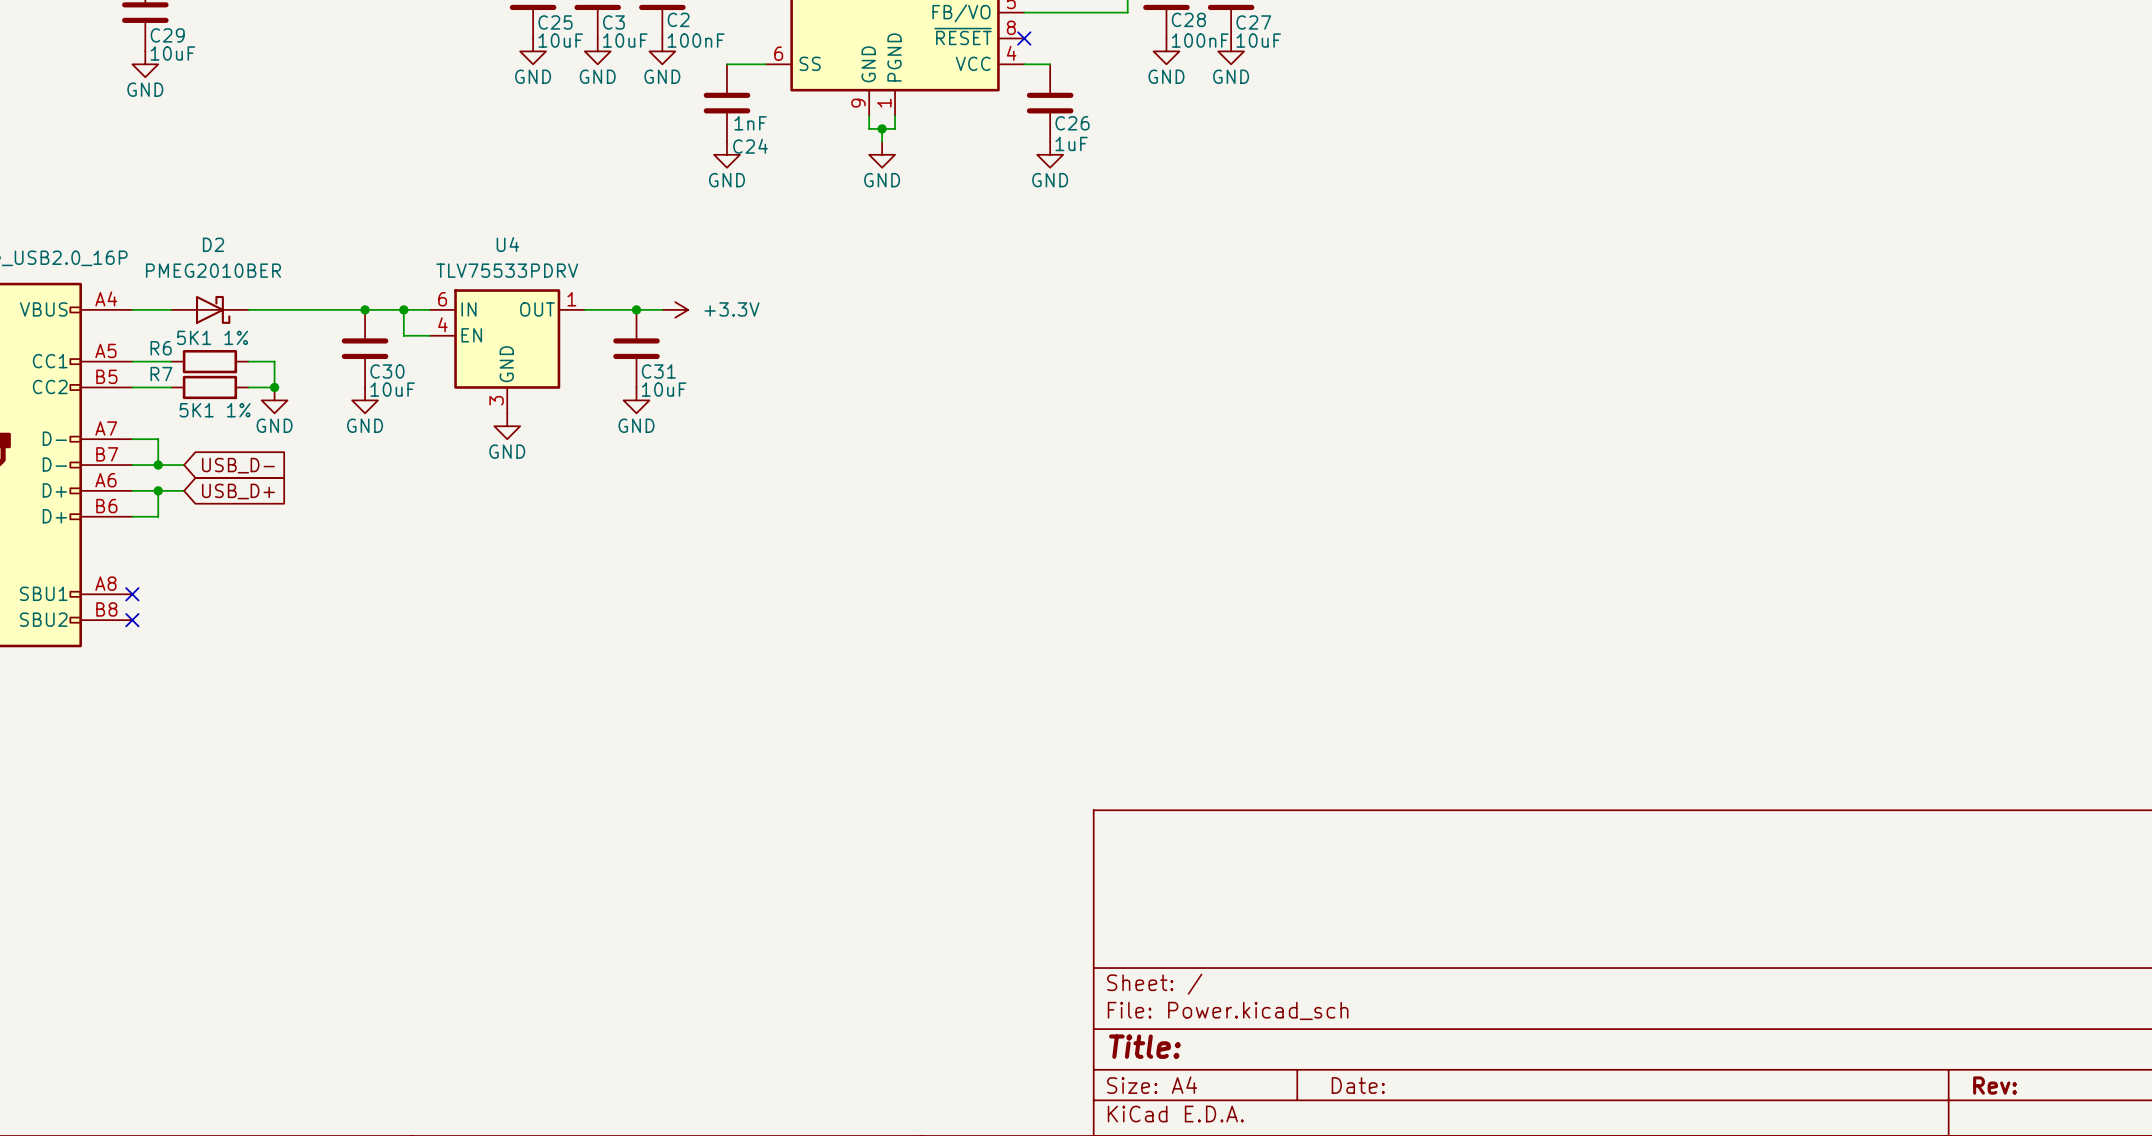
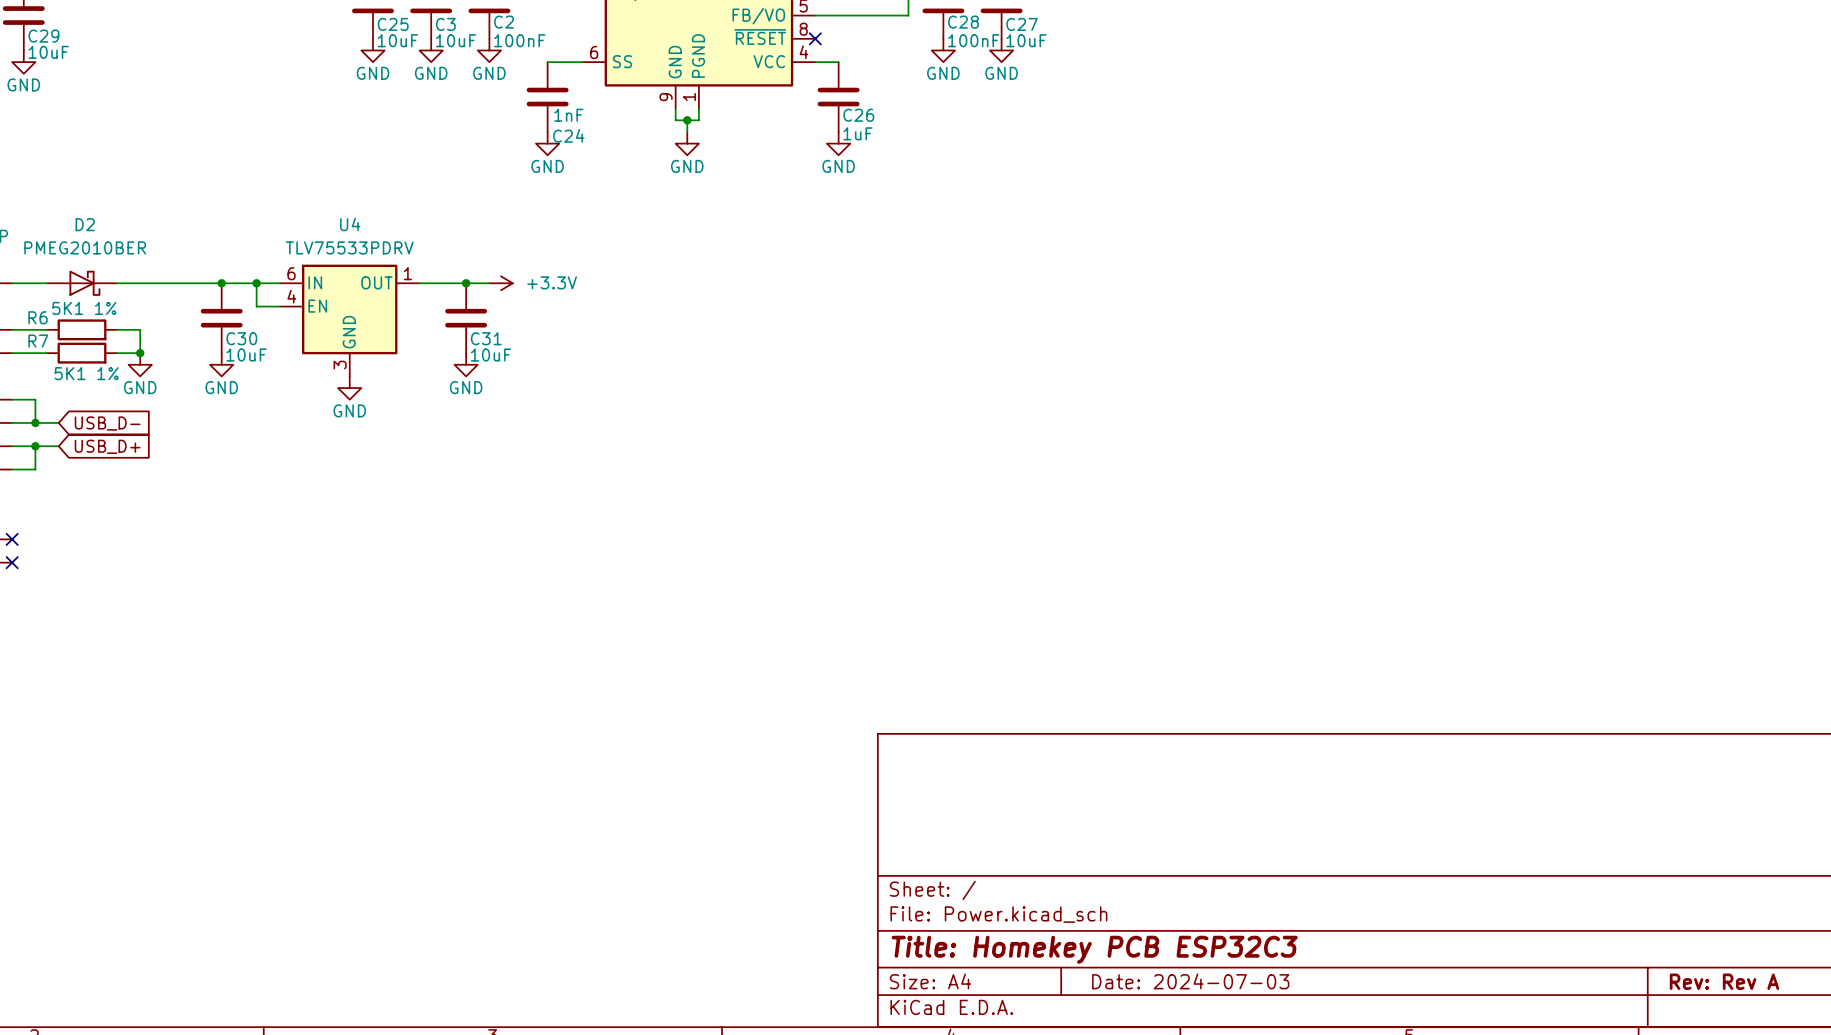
title block: Title: (1144, 1046) -> Title: Homekey PCB ESP32C3 (1094, 949)
title block: Date: (1358, 1085) -> Date: 2024-07-03 (1190, 981)
title block: Rev: (1995, 1085) -> Rev: Rev A (1724, 981)

